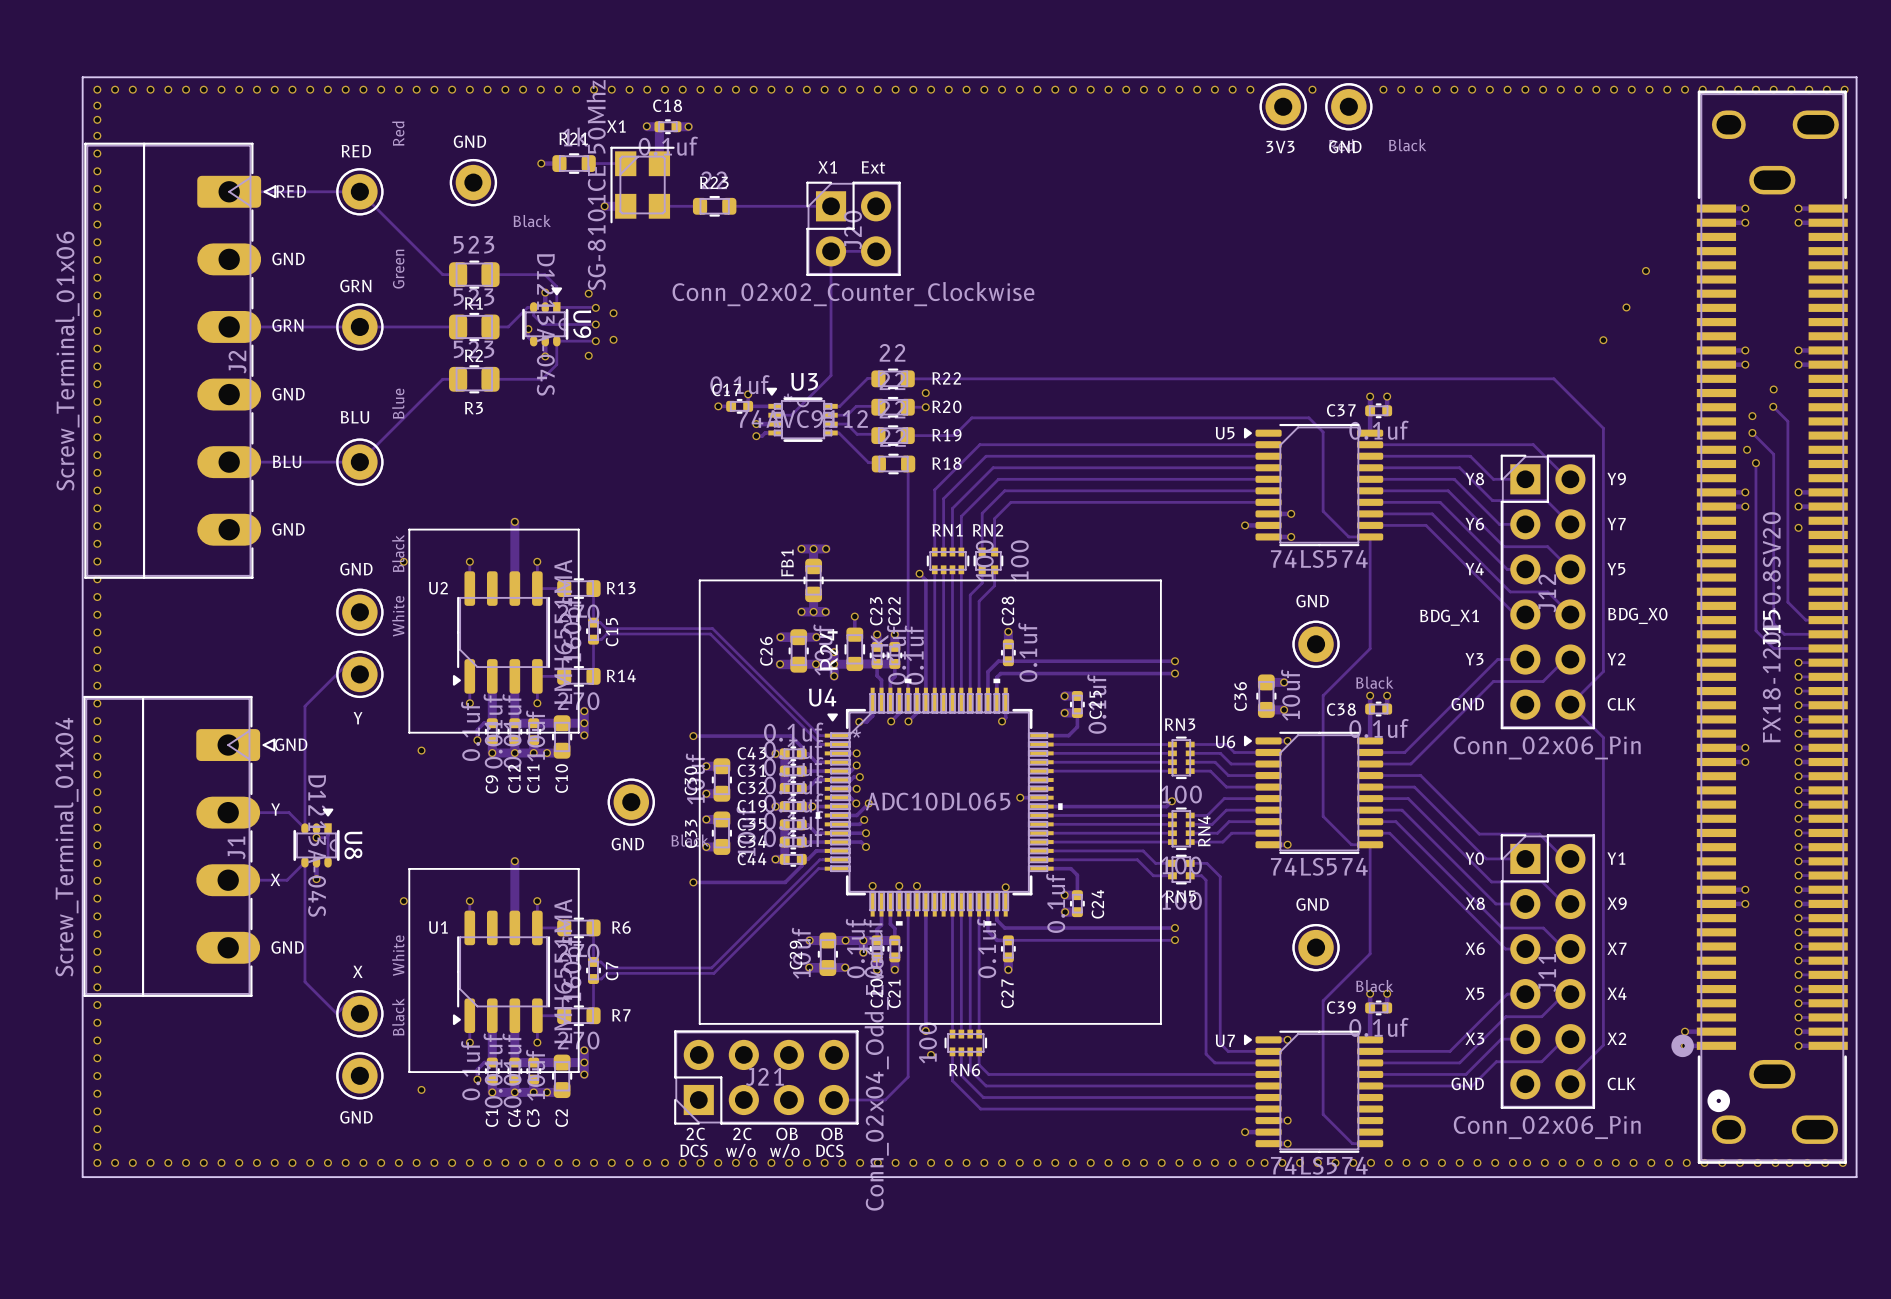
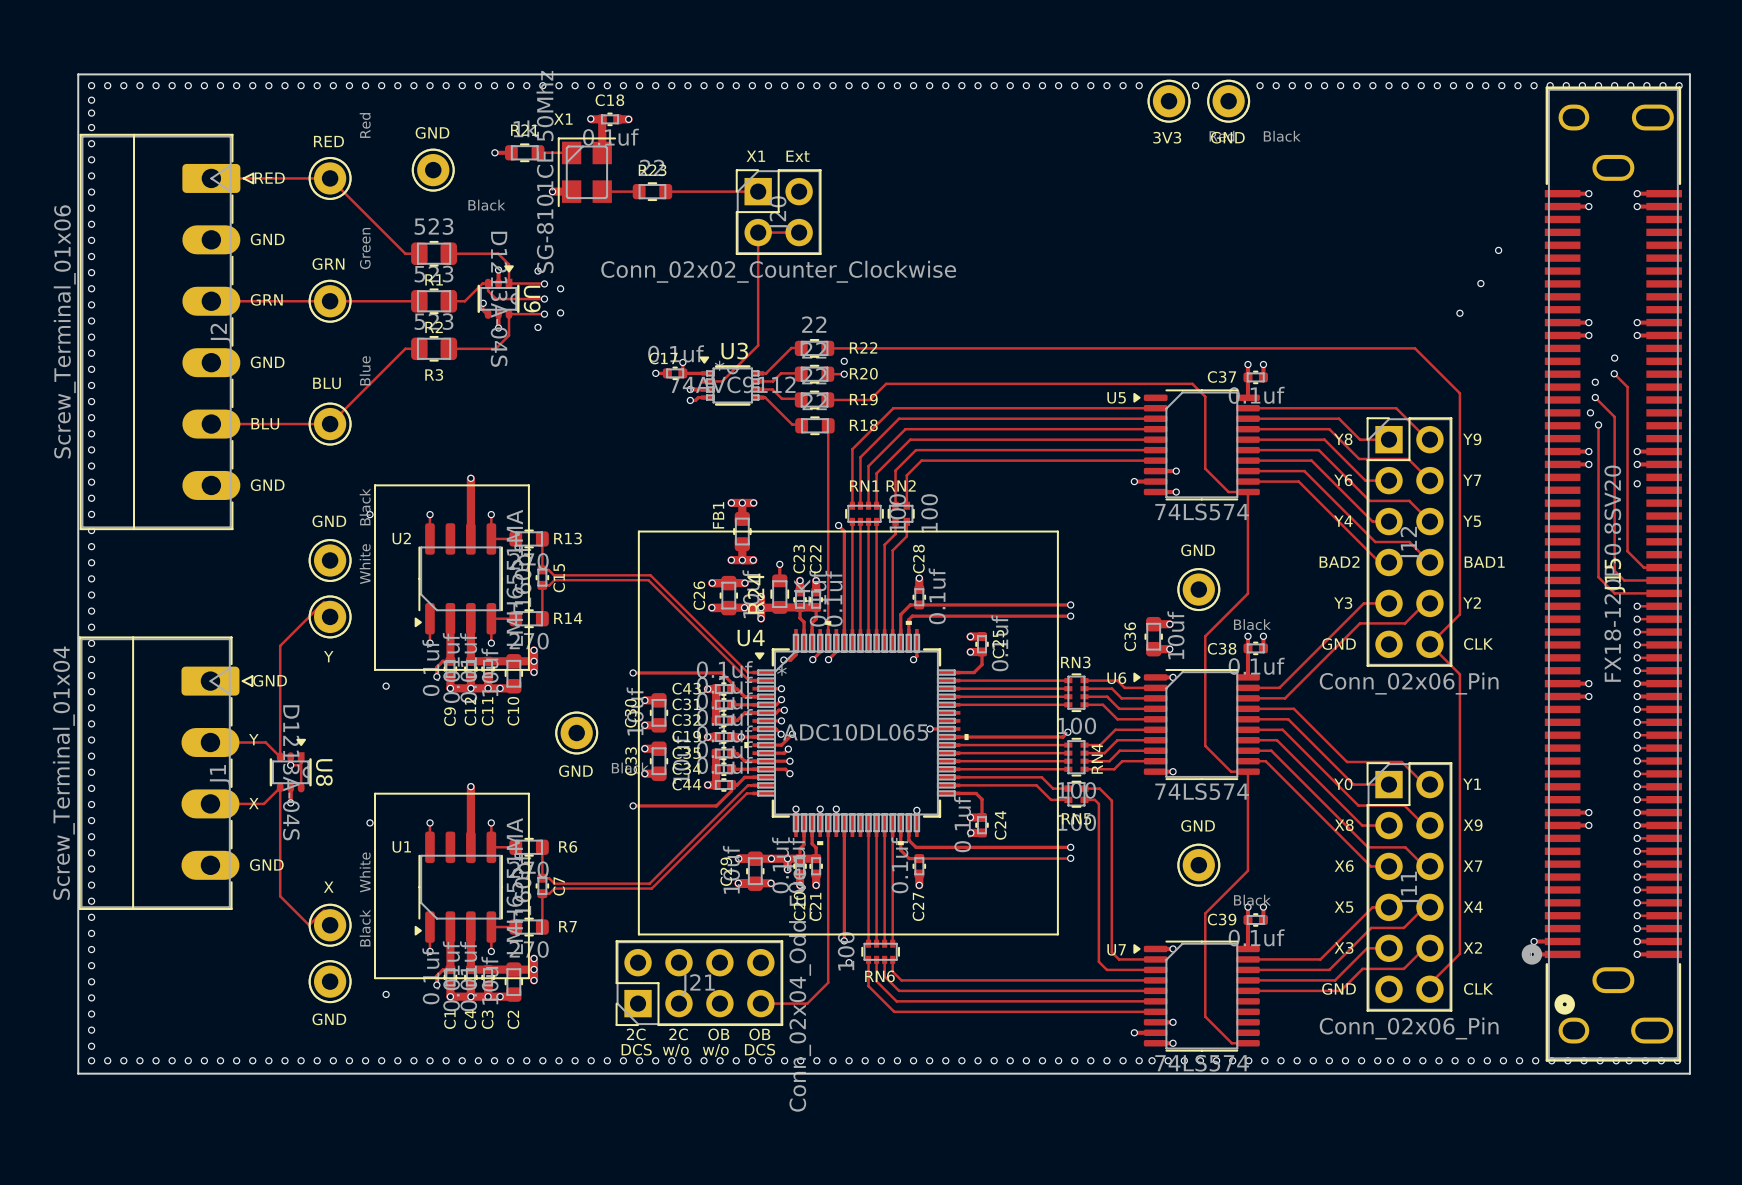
text: none -> BAD2 (1339, 562)
text: BDG_X0 (1637, 615) -> BAD1 (1484, 562)
text: BDG_X1 (1449, 617) -> none

